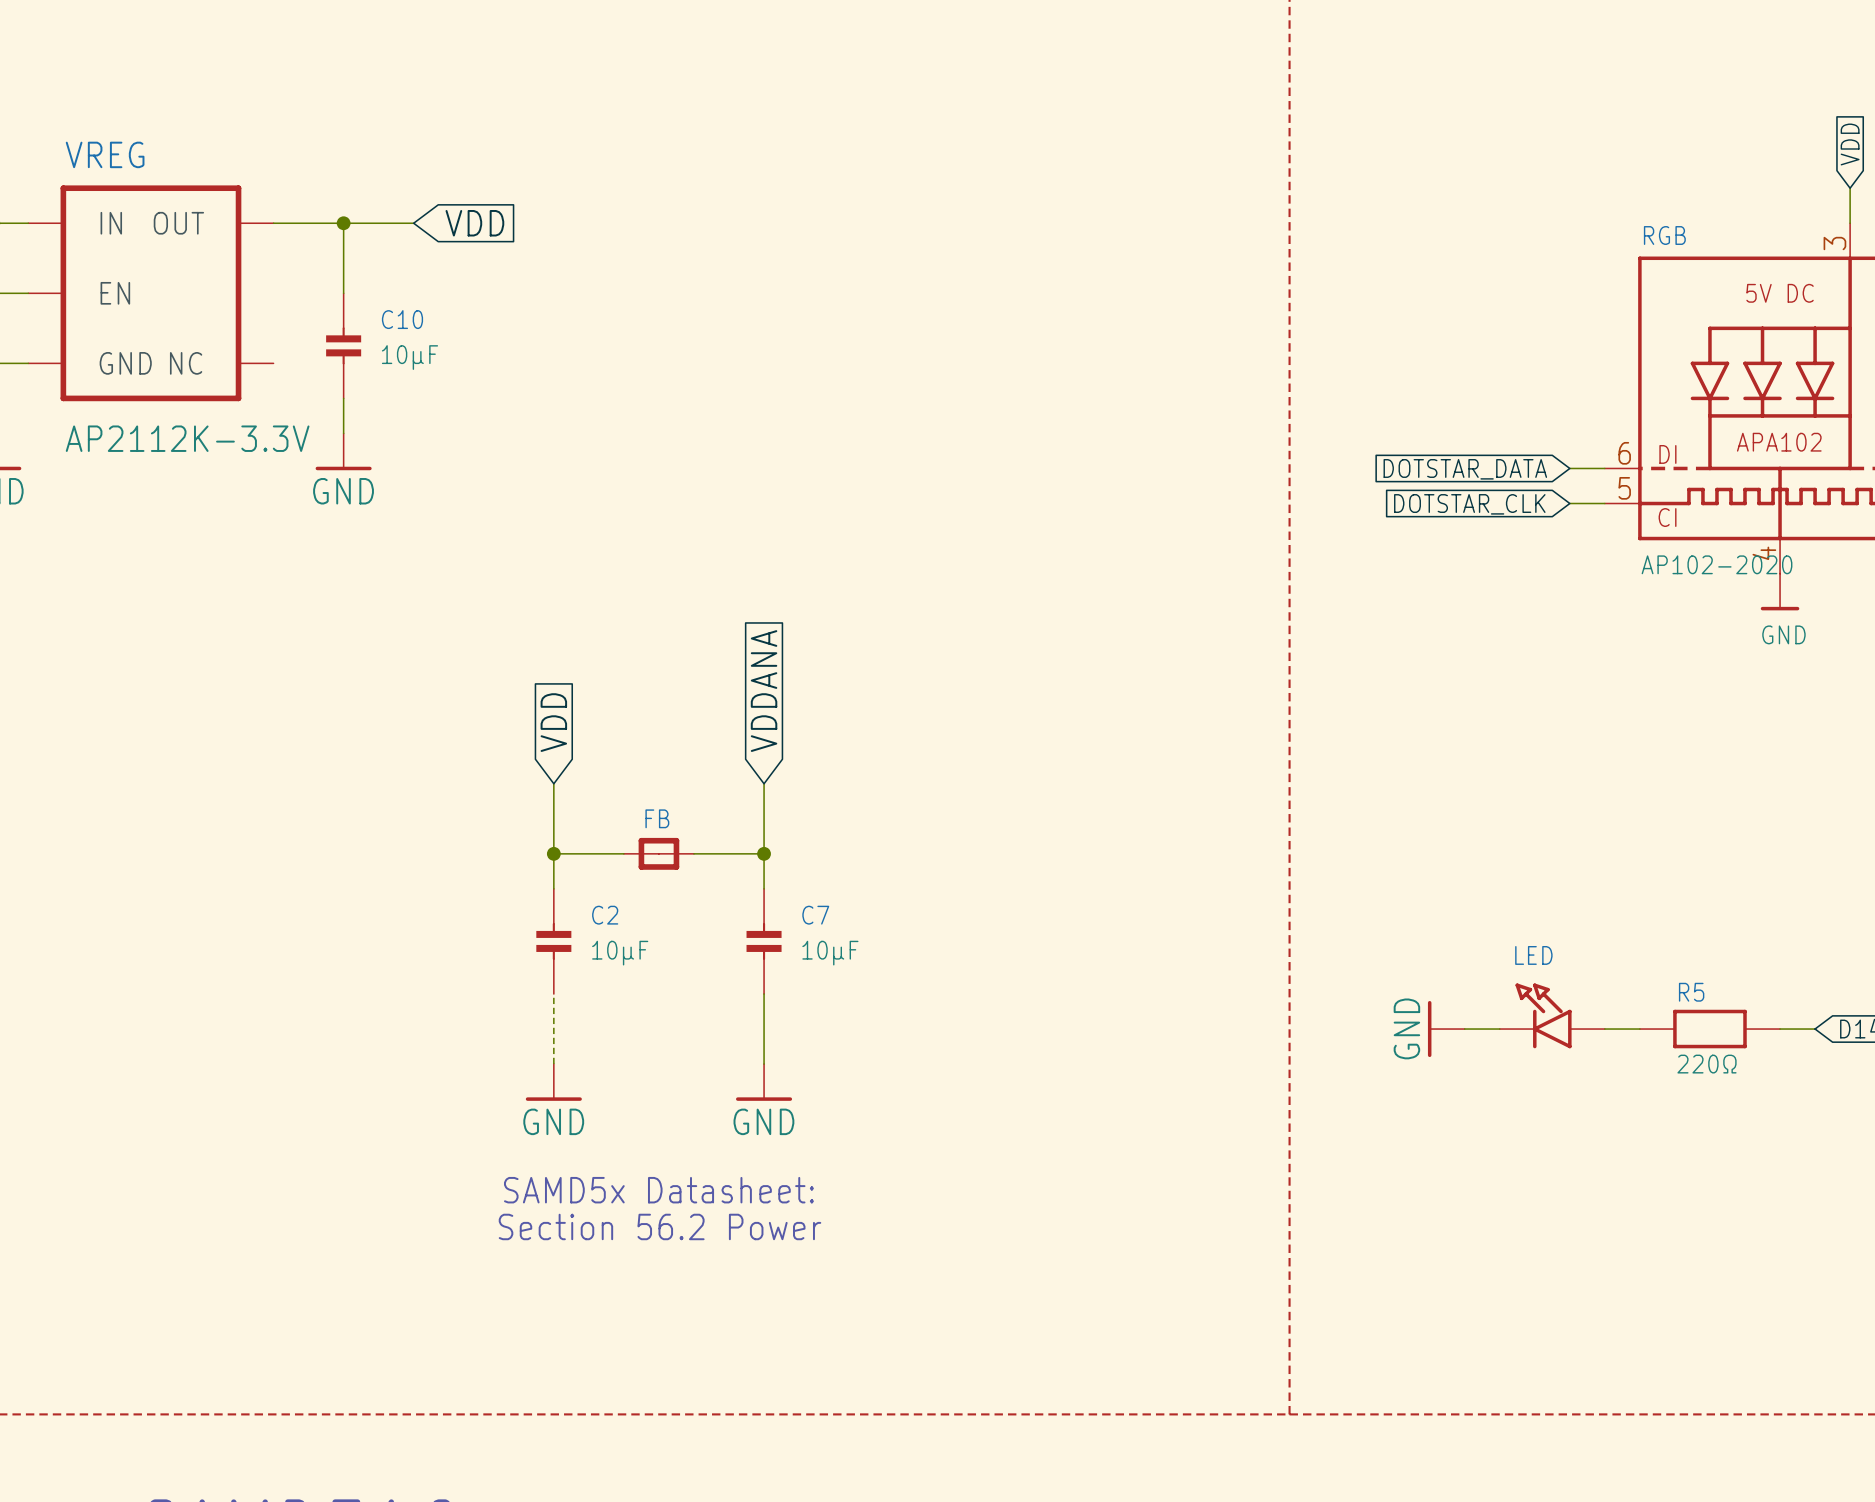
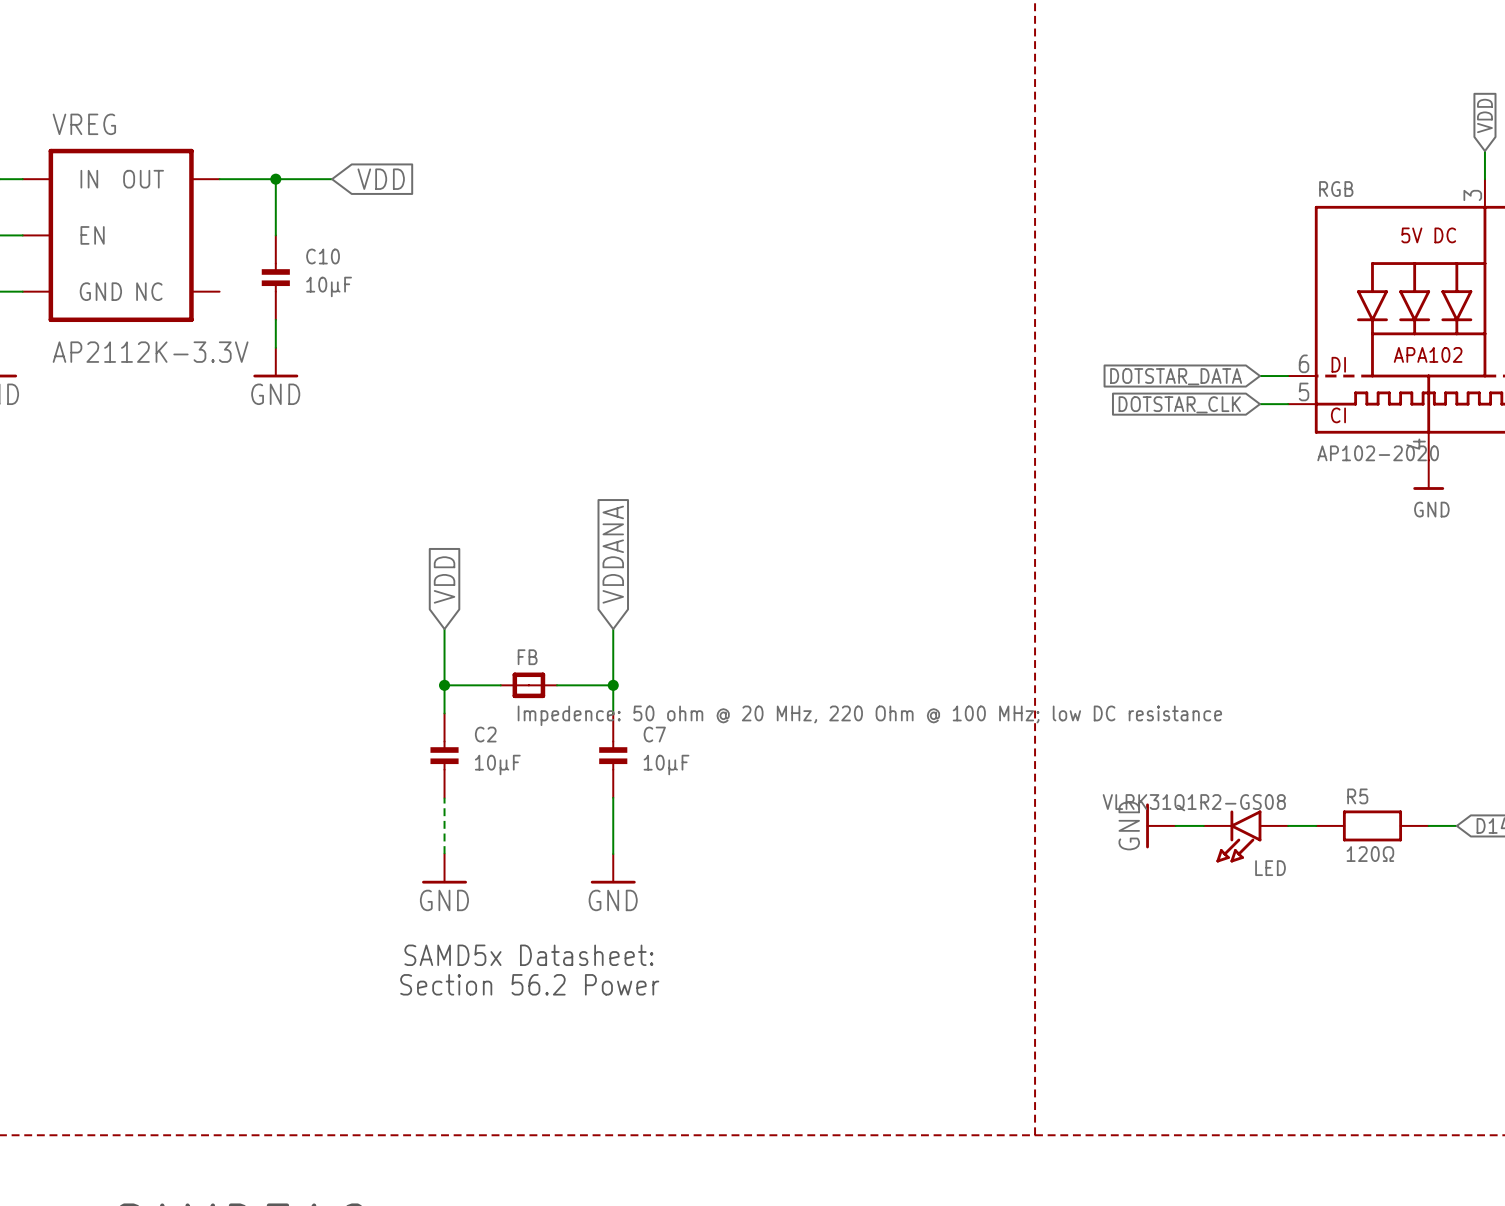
FB value: none -> Impedence: 50 ohm @ 20 MHz, 220 Ohm @ 100 MHz; low DC resistance (869, 715)
LED: (1552, 1015) -> none
LED: none -> VLRK31Q1R2-GS08 (1245, 836)
R5 value: 220Ω (1707, 1064) -> 120Ω (1370, 854)

